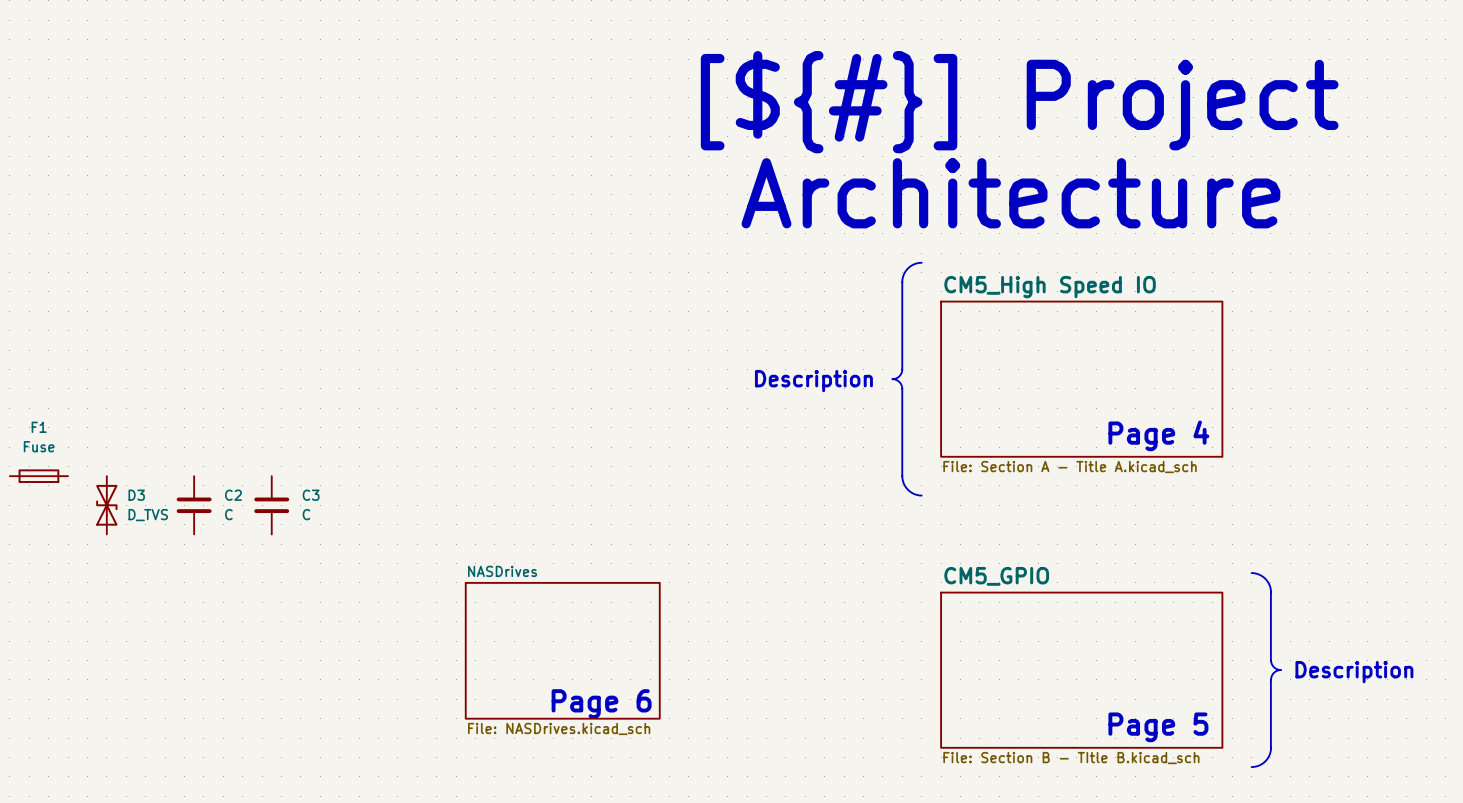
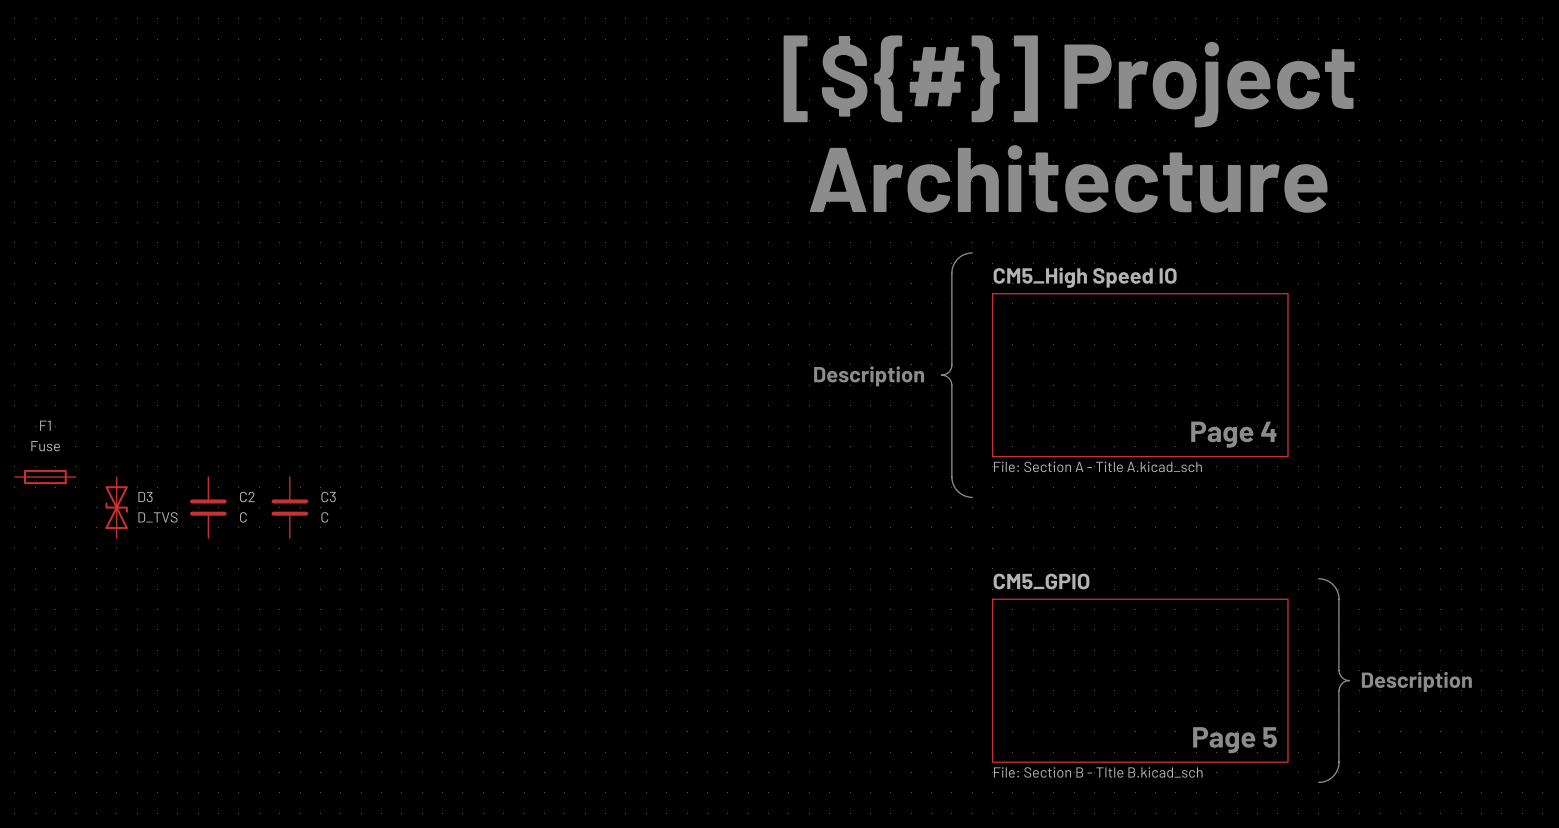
sheet NASDrives: File: NASDrives.kicad_sch (562, 650) -> none
text: Page 6 (601, 704) -> none

